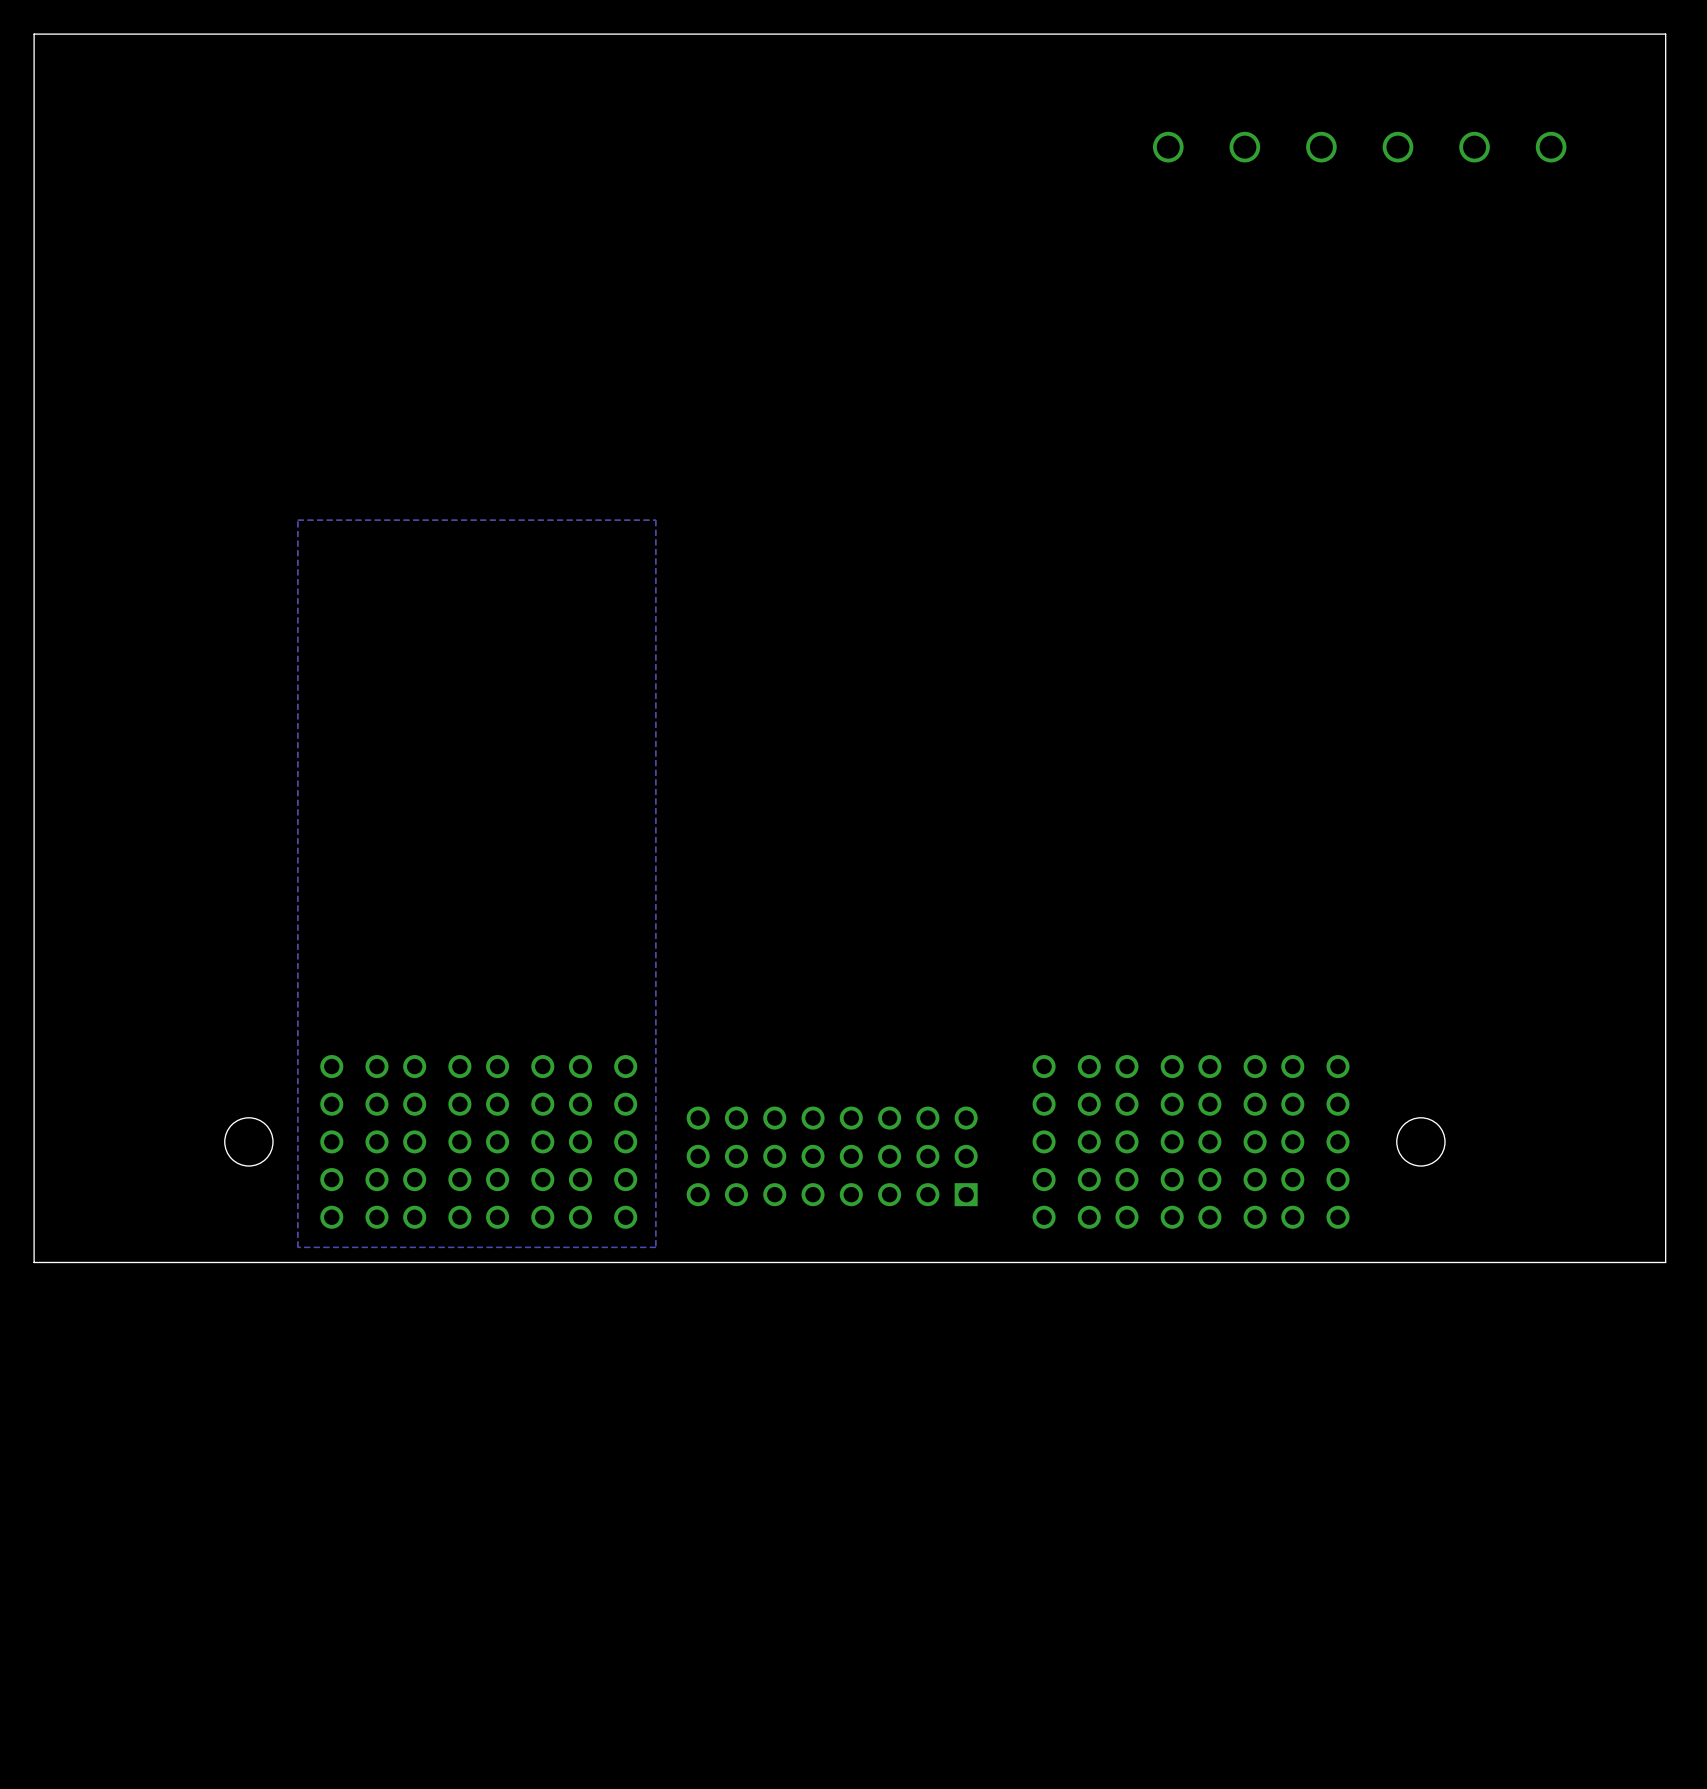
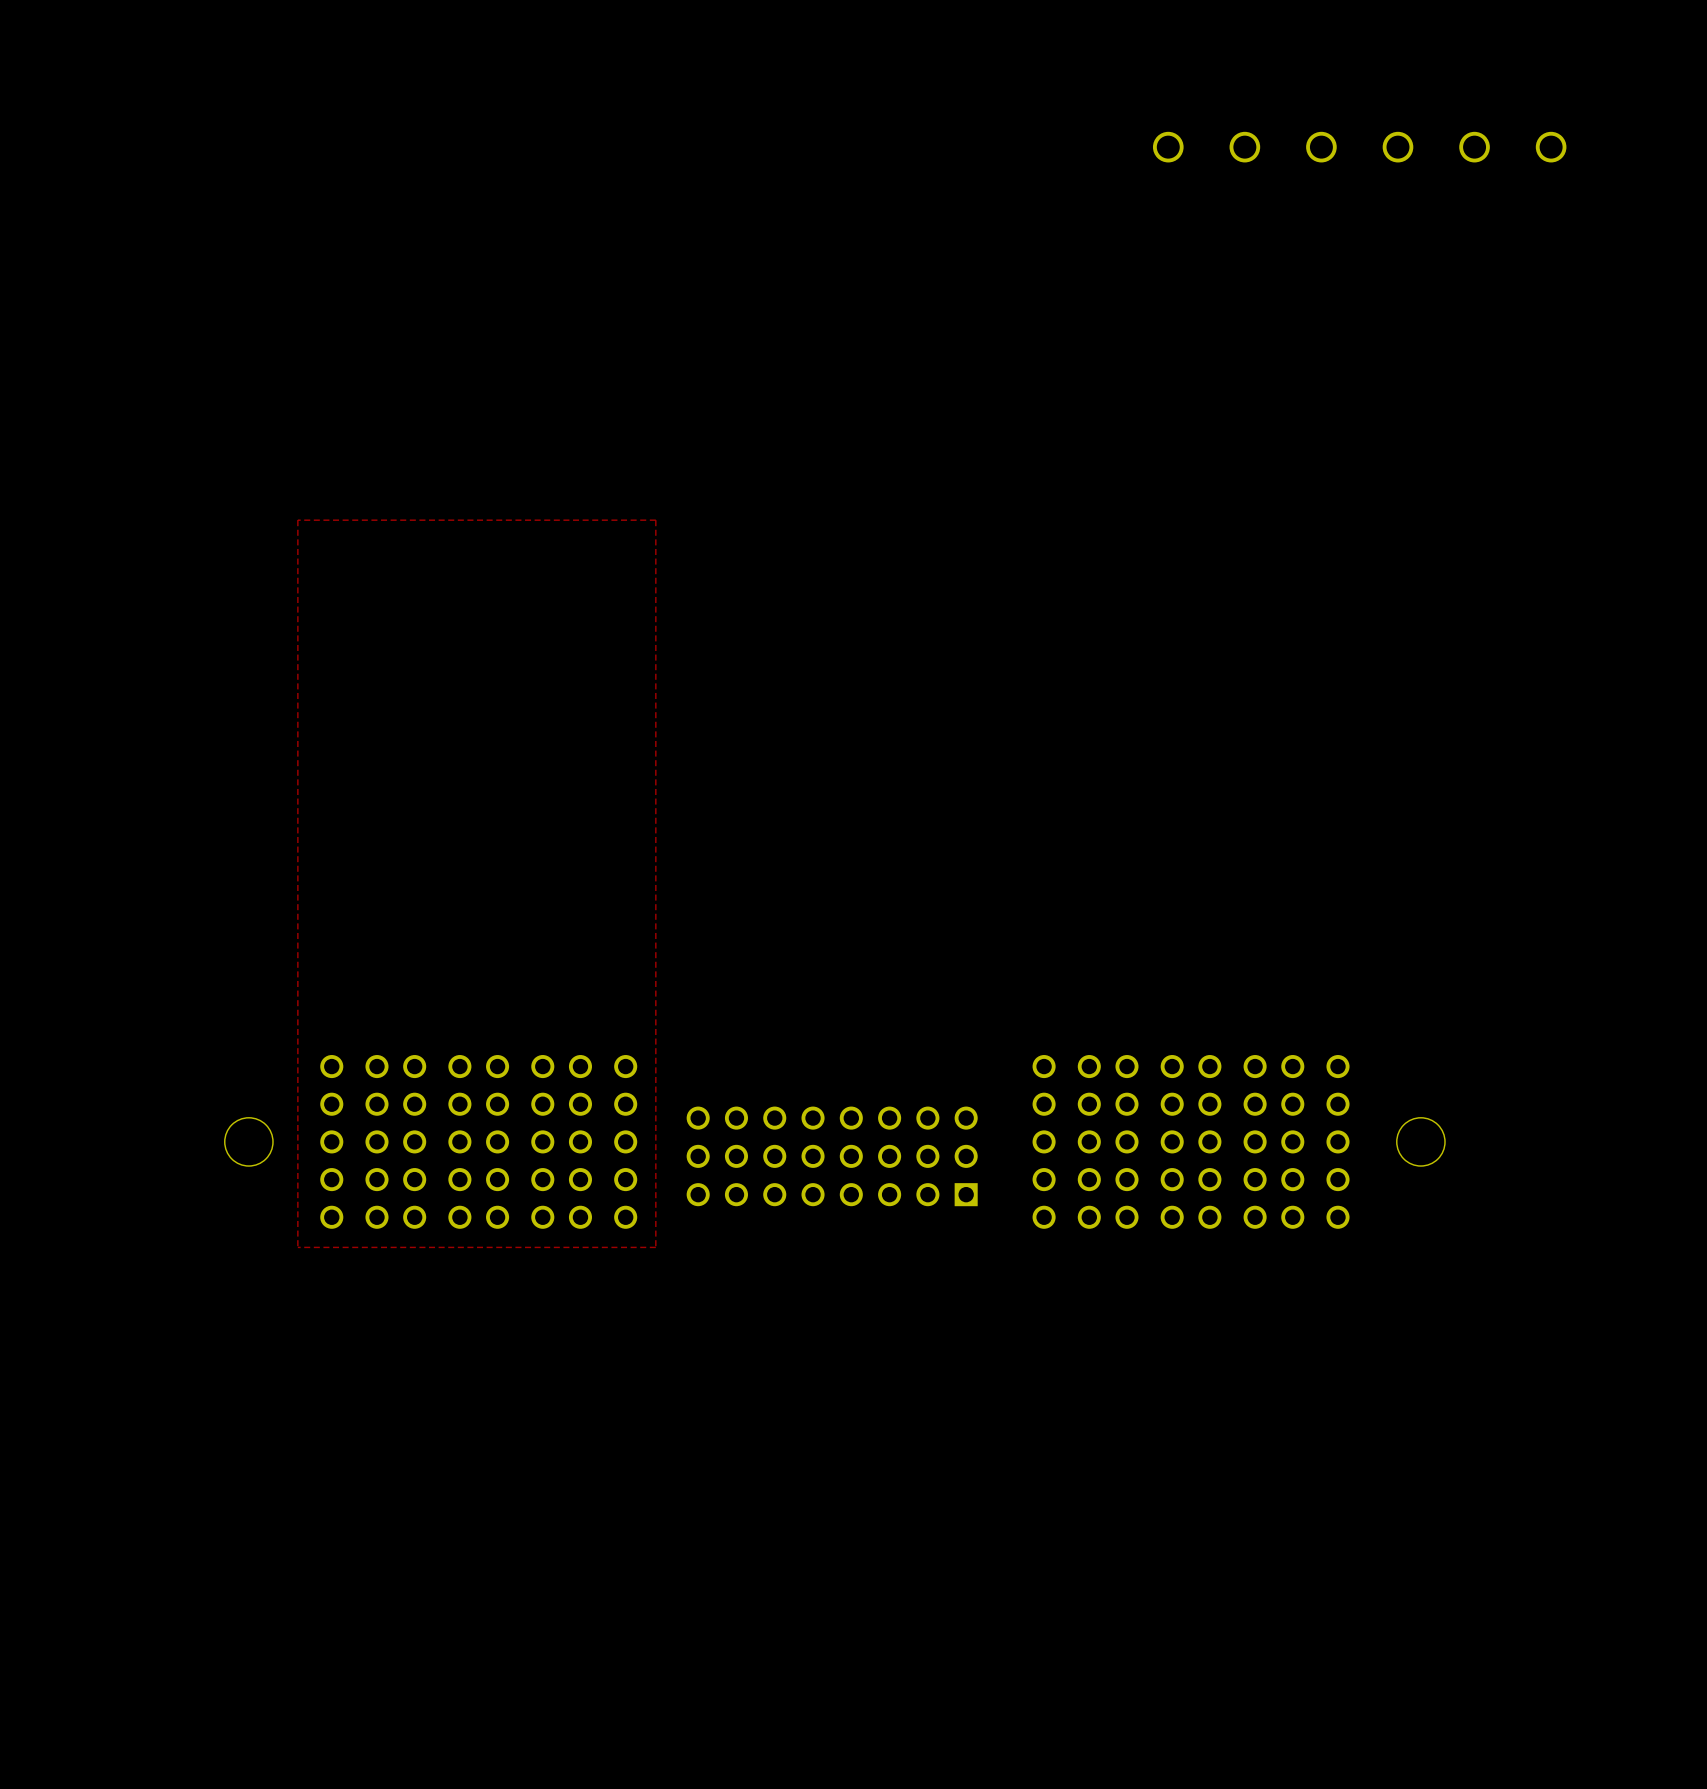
board edge: (1665, 34) (34, 34) (34, 1262) (1665, 1262) (1665, 34) -> none
bottom zone outline: (655, 520) (297, 520) (297, 1247) (655, 1247) (655, 520) -> none

